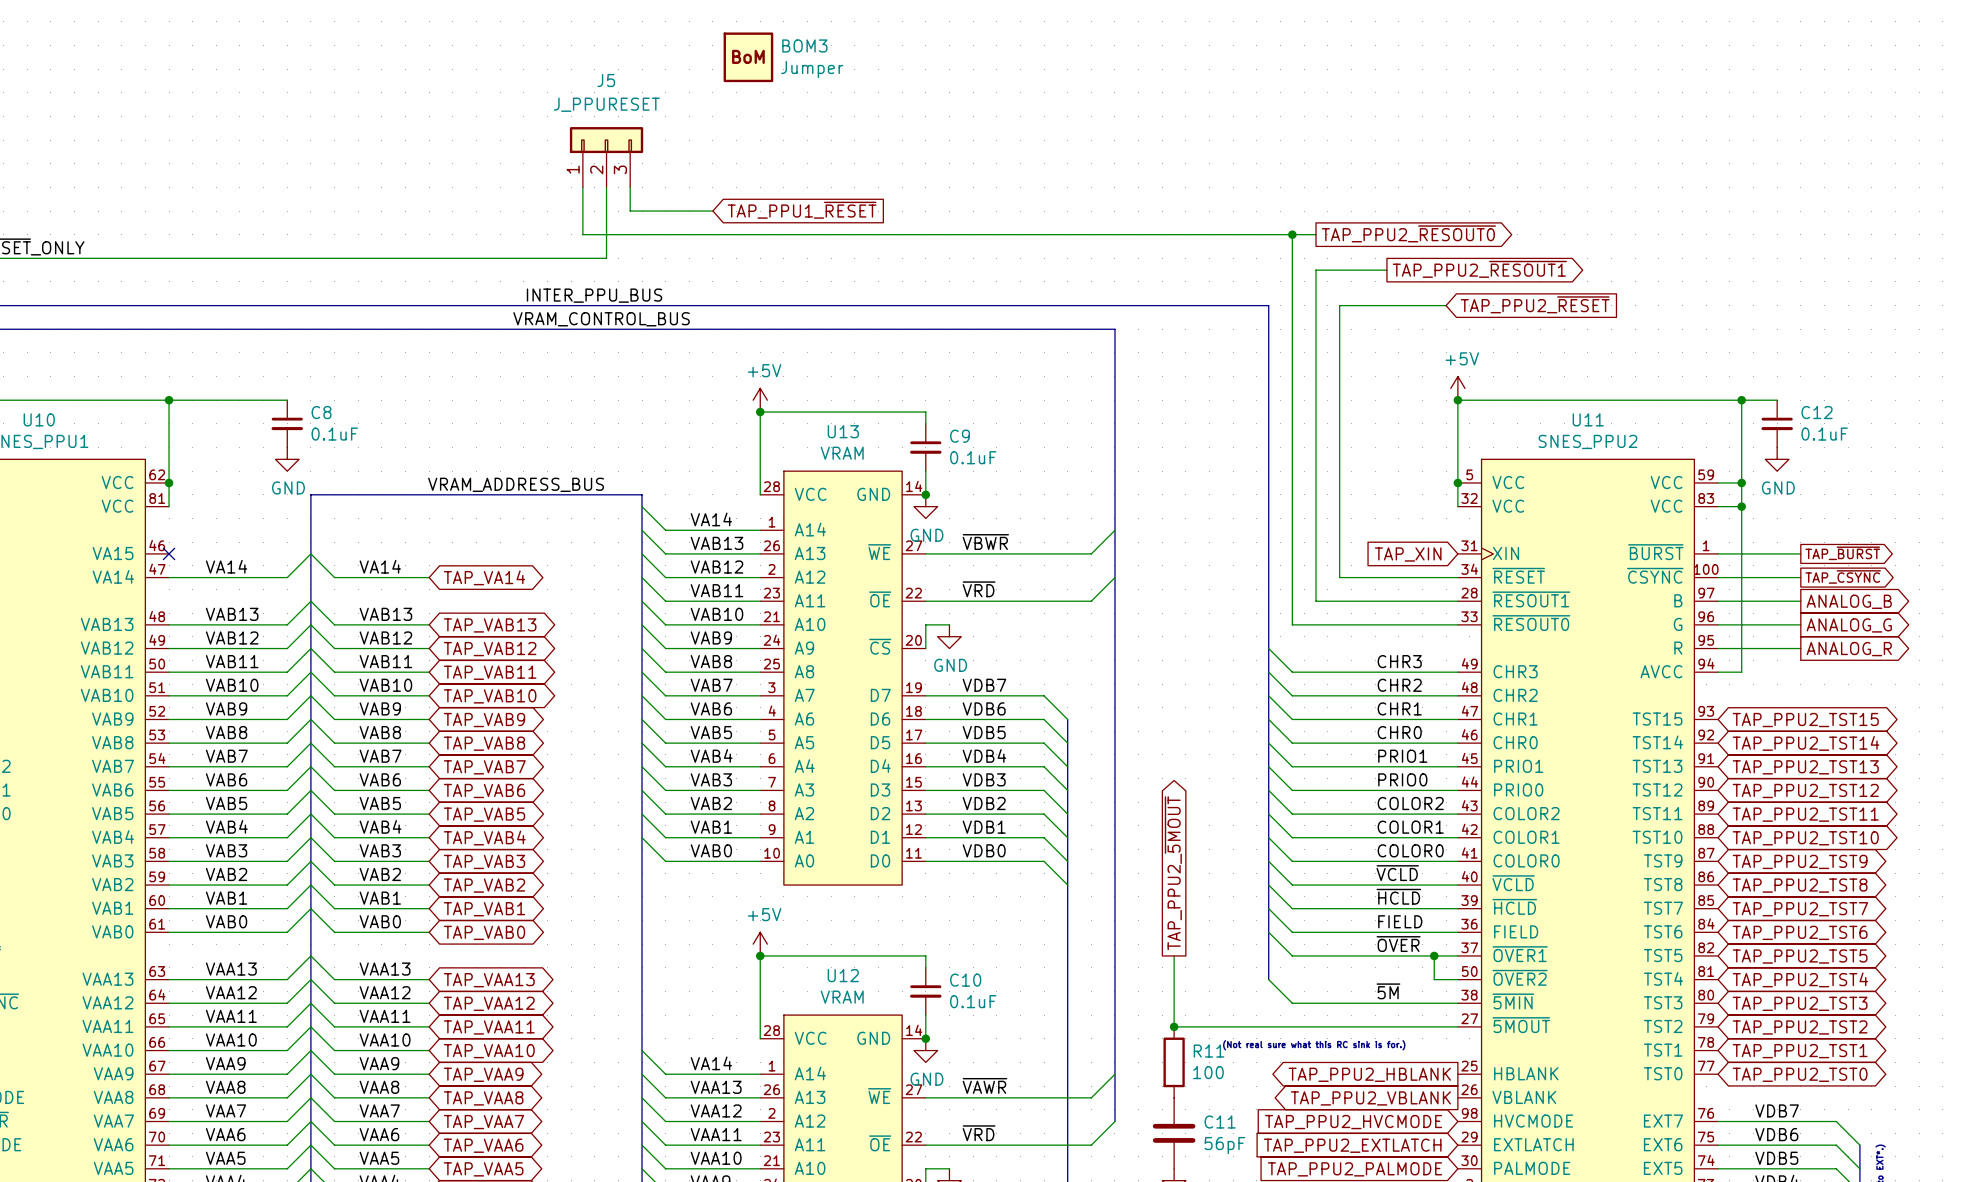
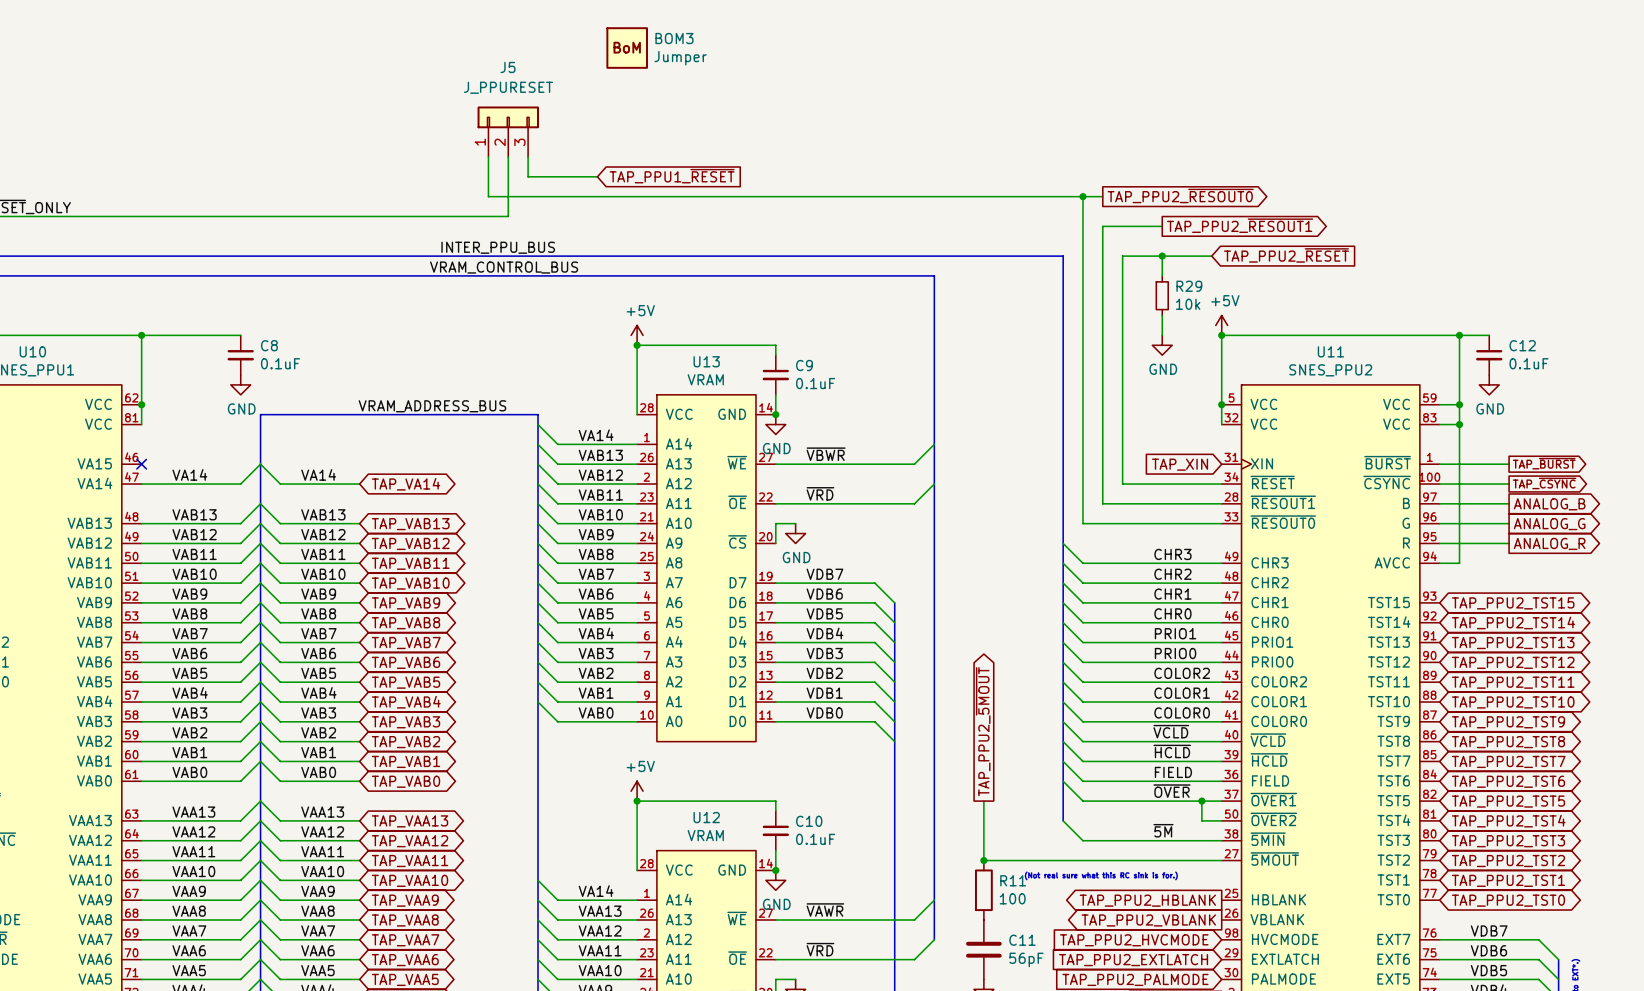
wire: none -> (1162, 256) (1162, 275)
junction: none -> (1162, 256)
R29: none -> 10k (1162, 295)
wire: none -> (1162, 315) (1162, 335)
power symbol: none -> GND (1162, 345)

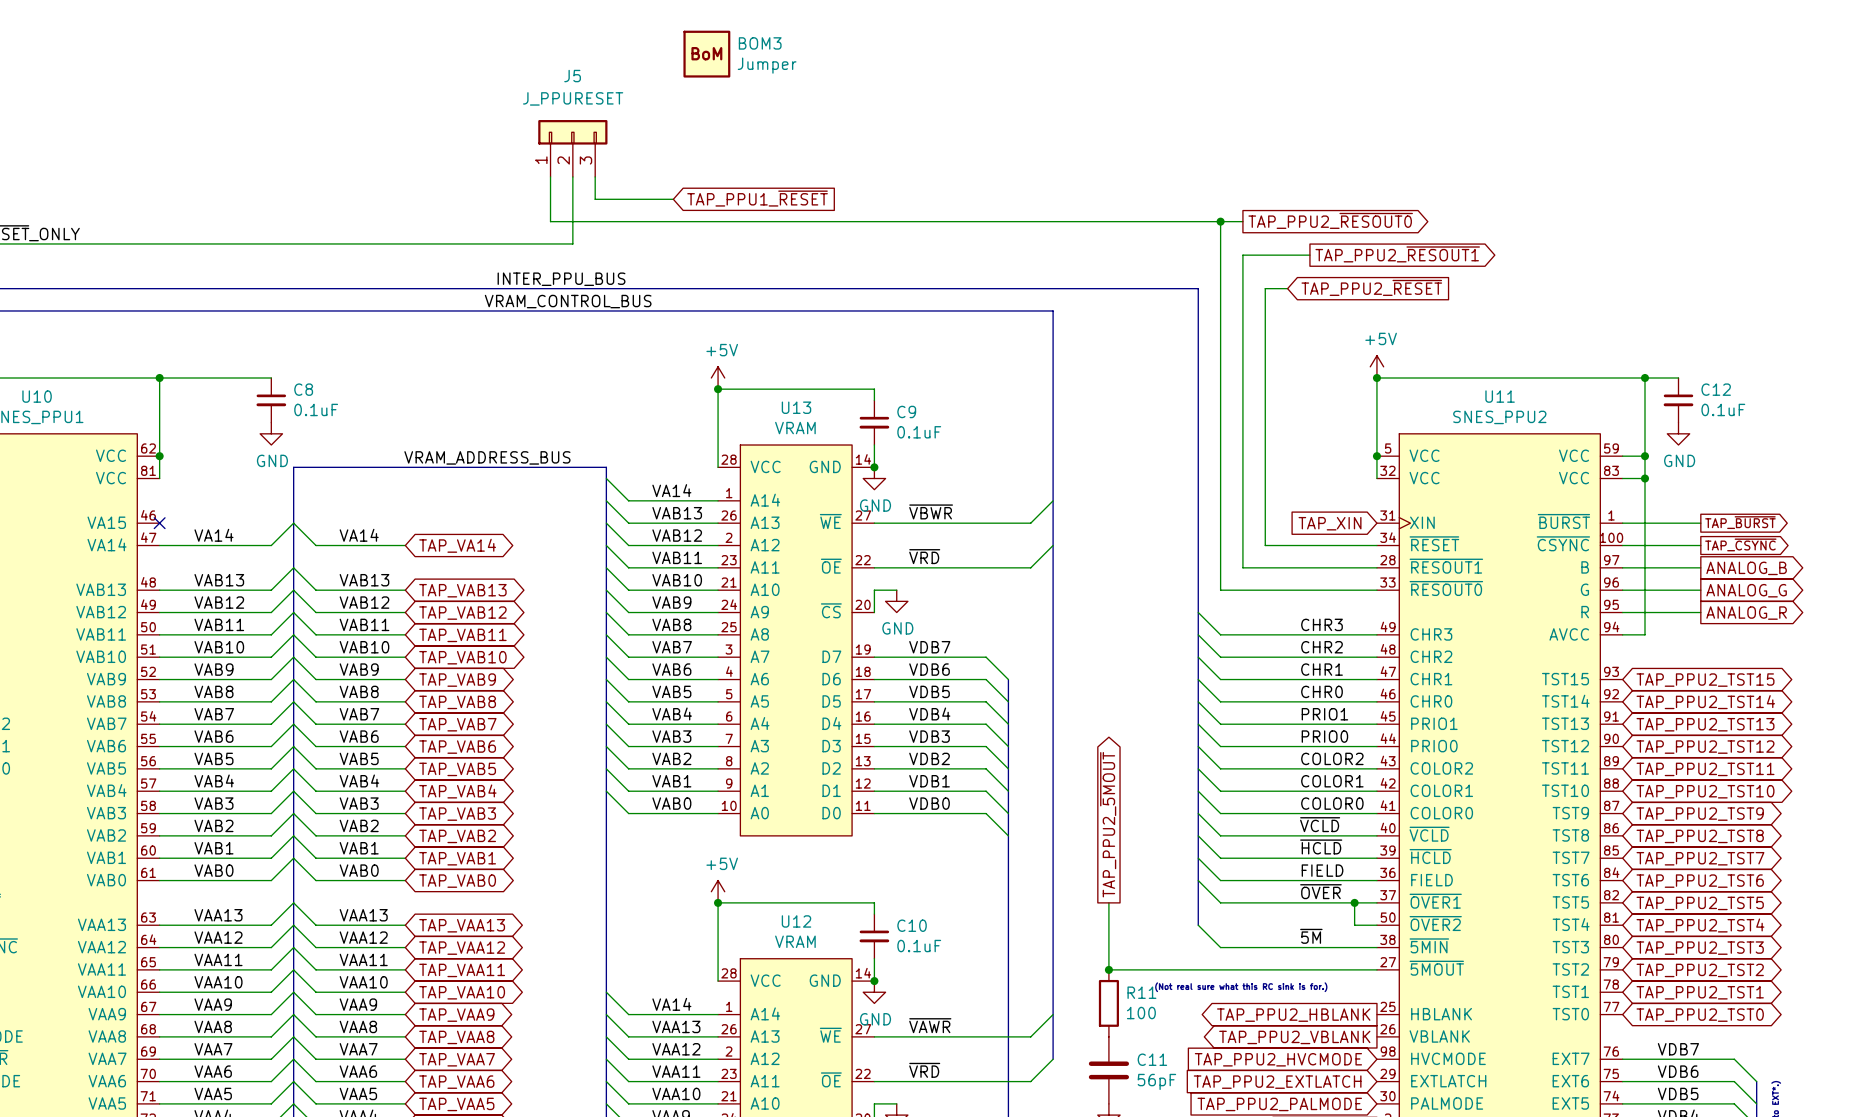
global label position: TAP_PPU2_~{RESET} (1286, 255) -> TAP_PPU2_~{RESET} (1371, 287)
wire: (1142, 256) (1211, 256) -> none
wire: (1162, 256) (1162, 275) -> none
junction: (1162, 256) -> none
R29: 10k (1162, 295) -> none
wire: (1162, 315) (1162, 335) -> none
power symbol: GND (1162, 345) -> none

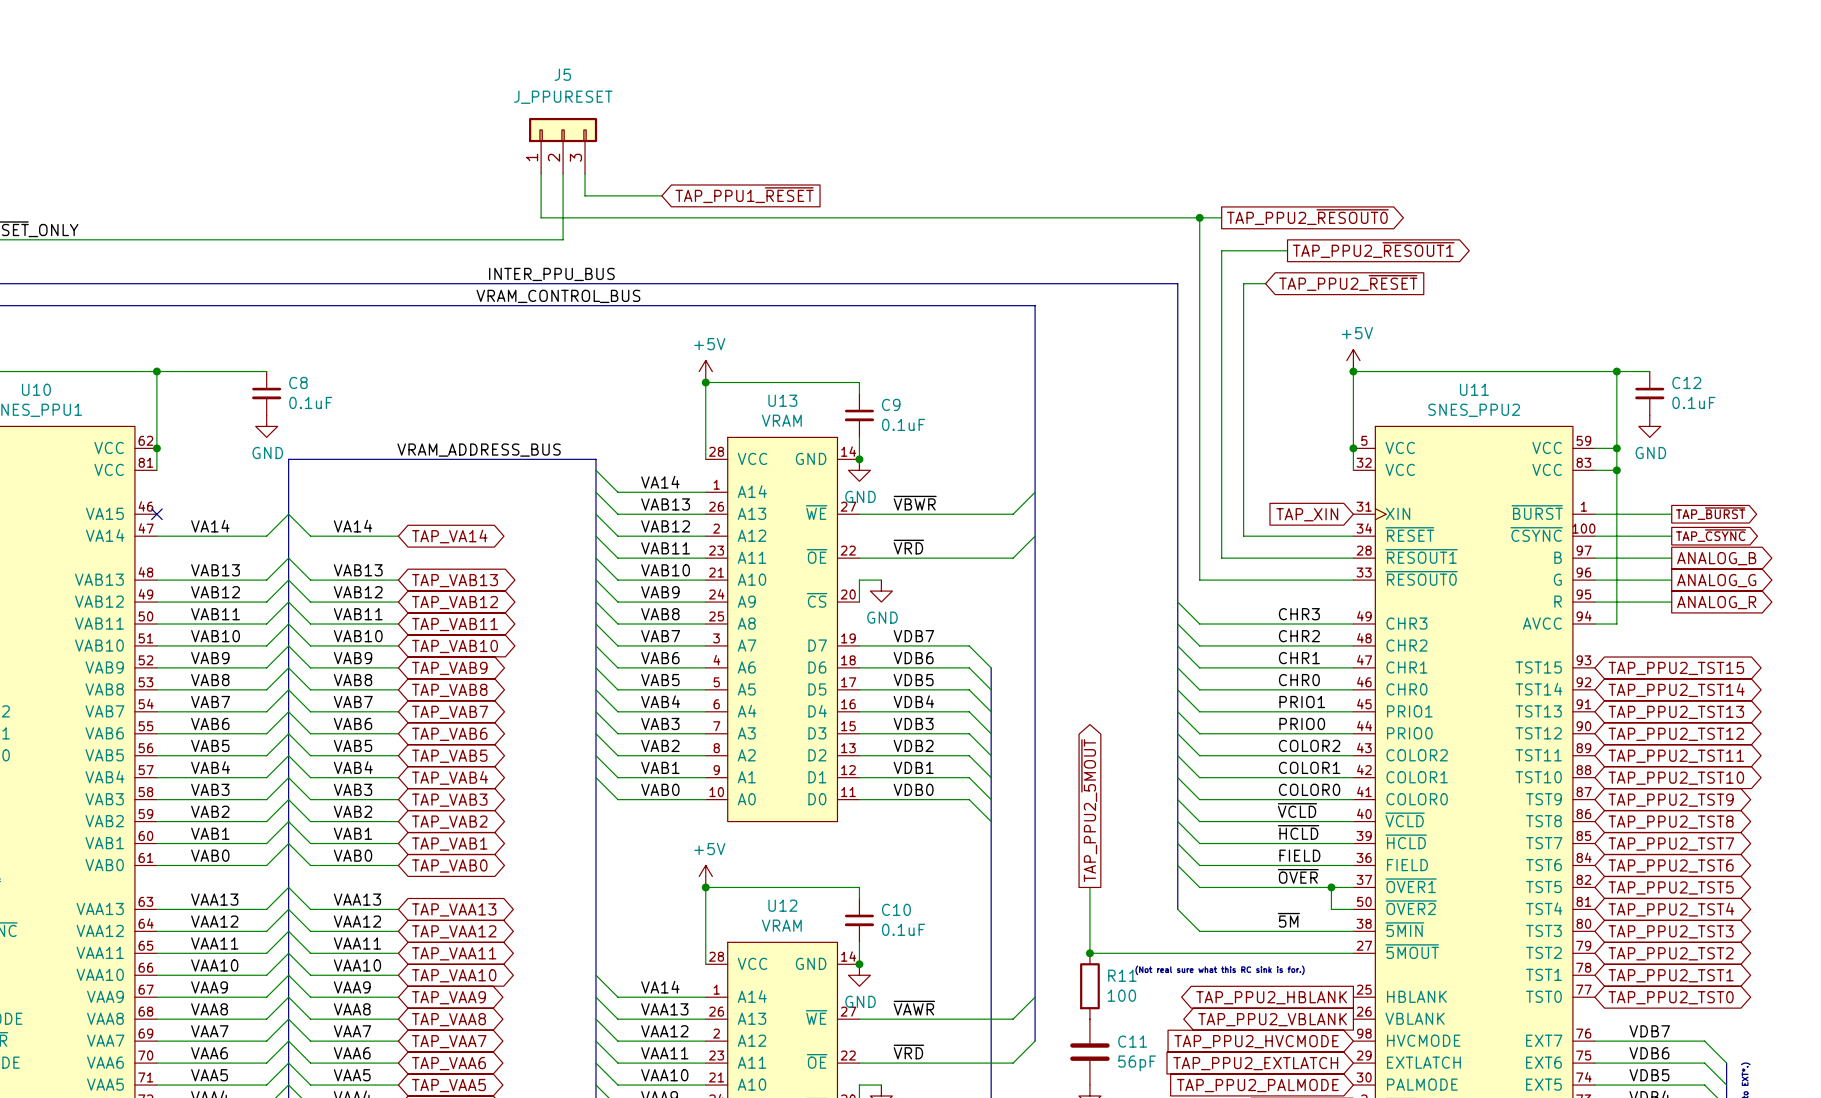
BOM3: Jumper (706, 54) -> none

